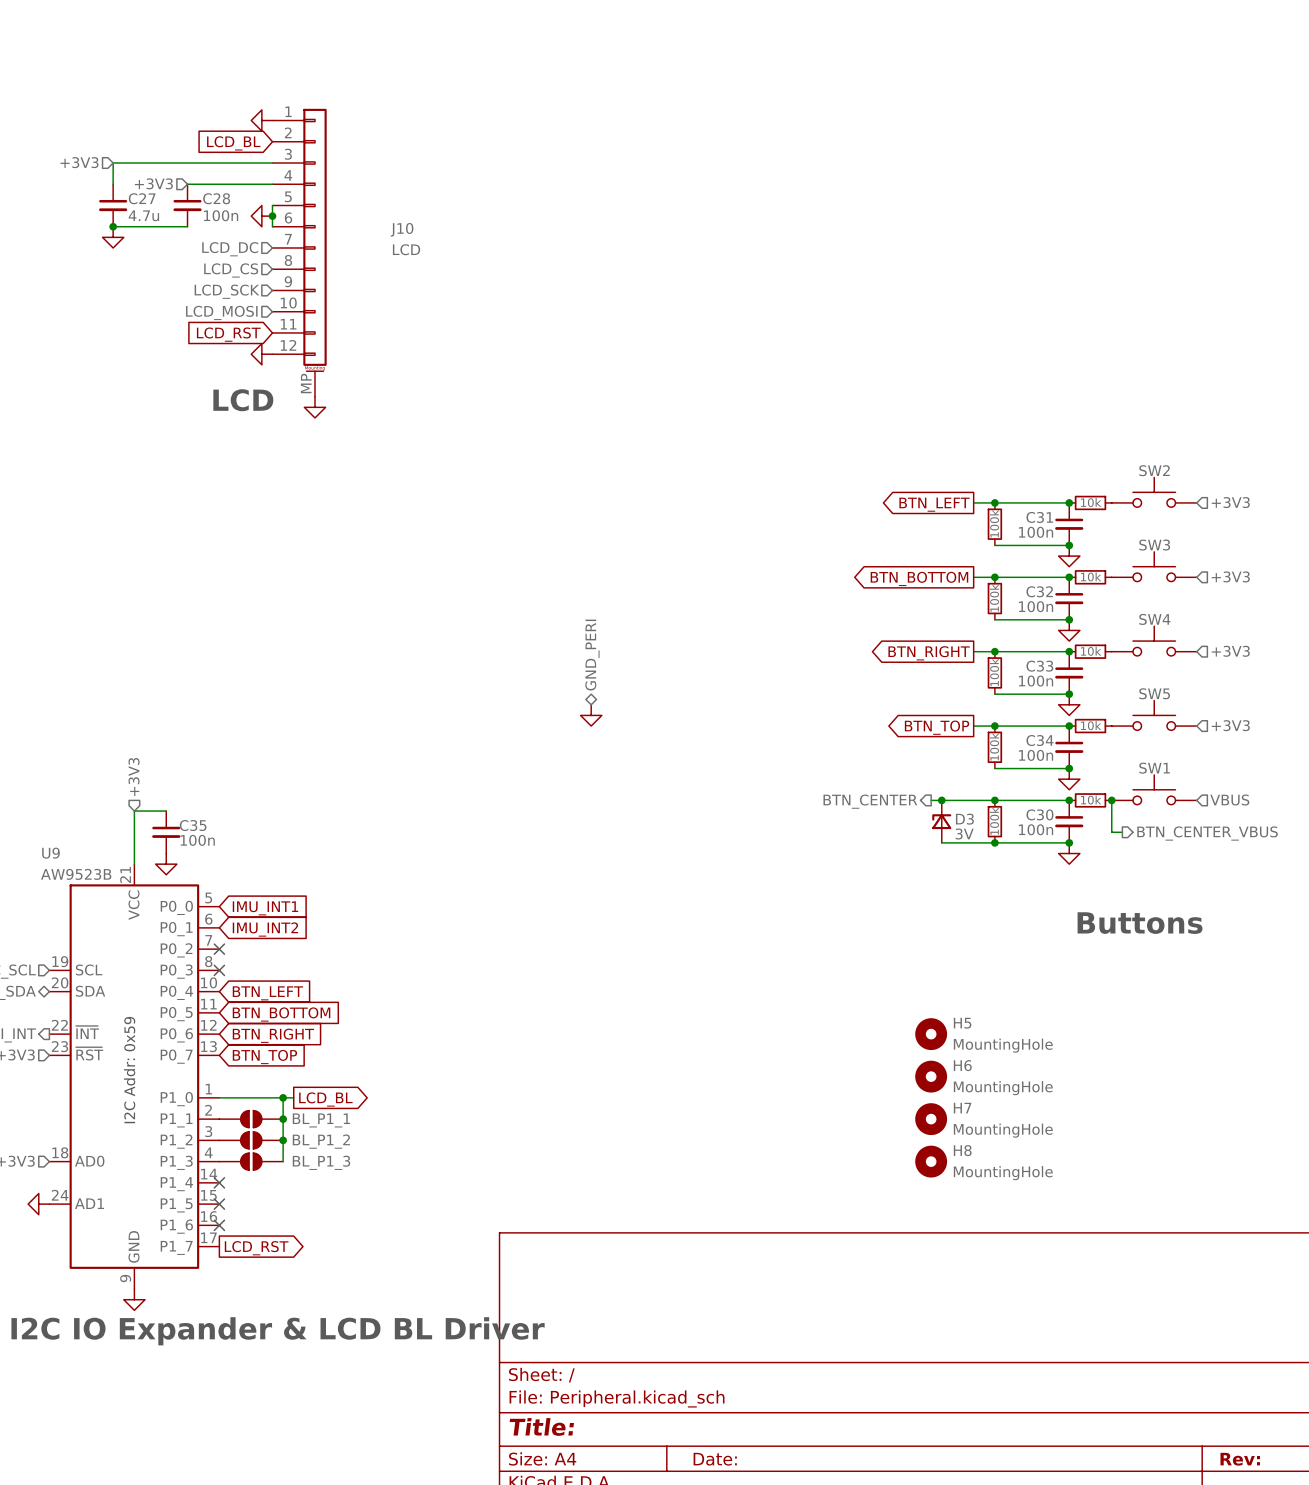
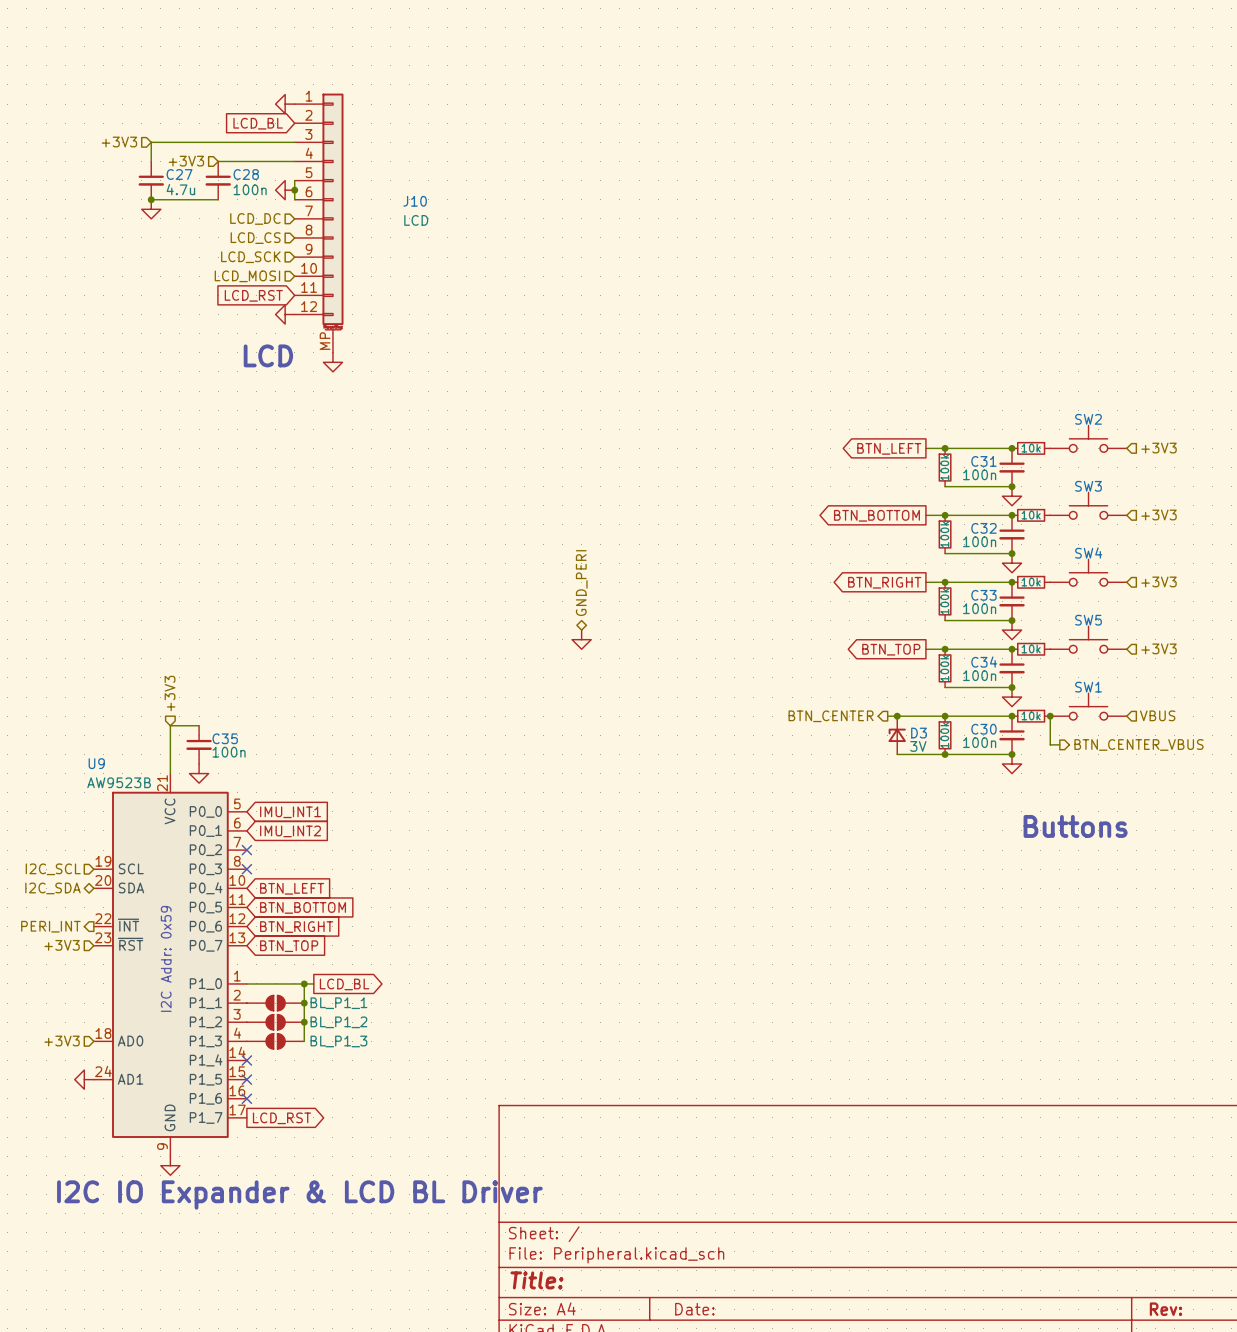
H5: MountingHole (931, 1034) -> none
H6: MountingHole (931, 1076) -> none
H7: MountingHole (931, 1119) -> none
H8: MountingHole (931, 1161) -> none

